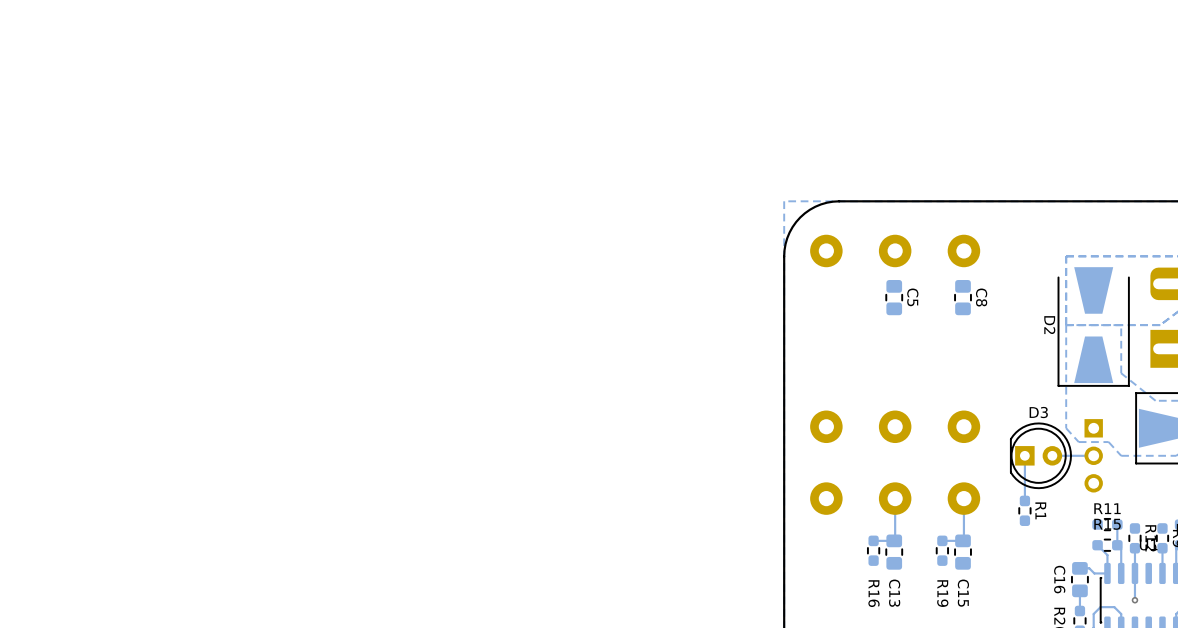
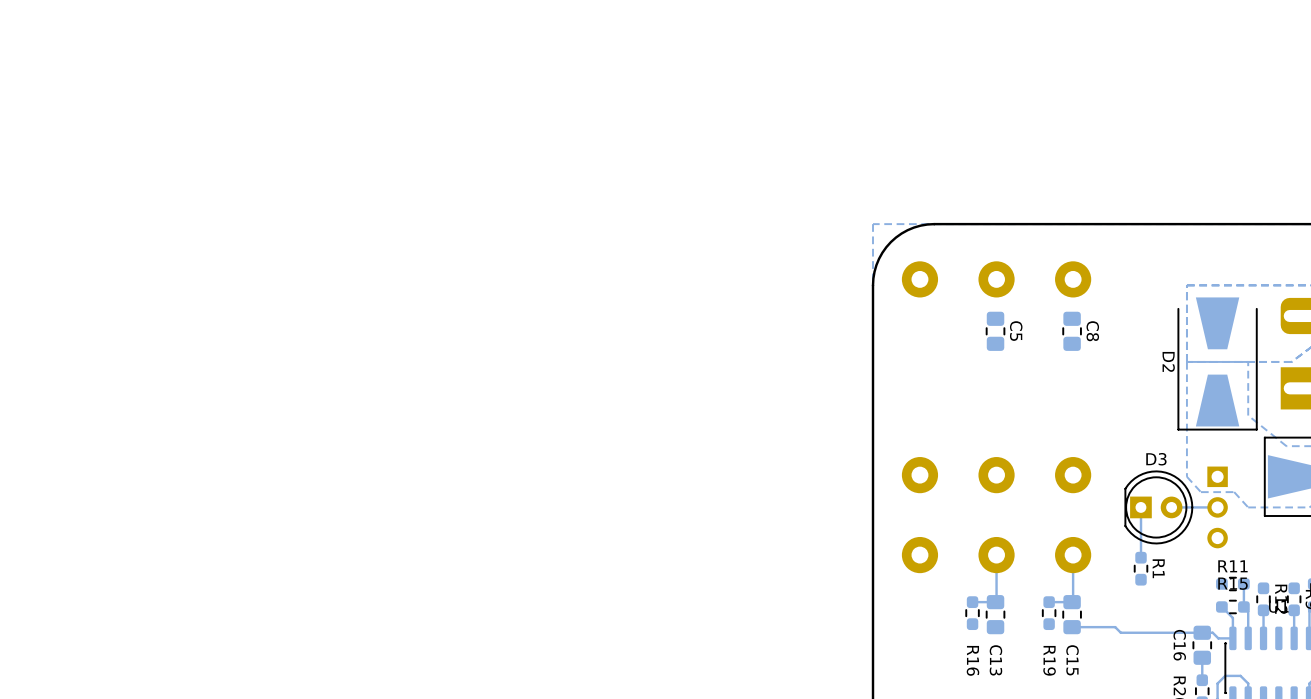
track: none -> (1072, 627) (1115, 627) (1120, 632) (1202, 632)
track: (1134, 573) (1134, 600) -> none
via: (1134, 600) -> none

